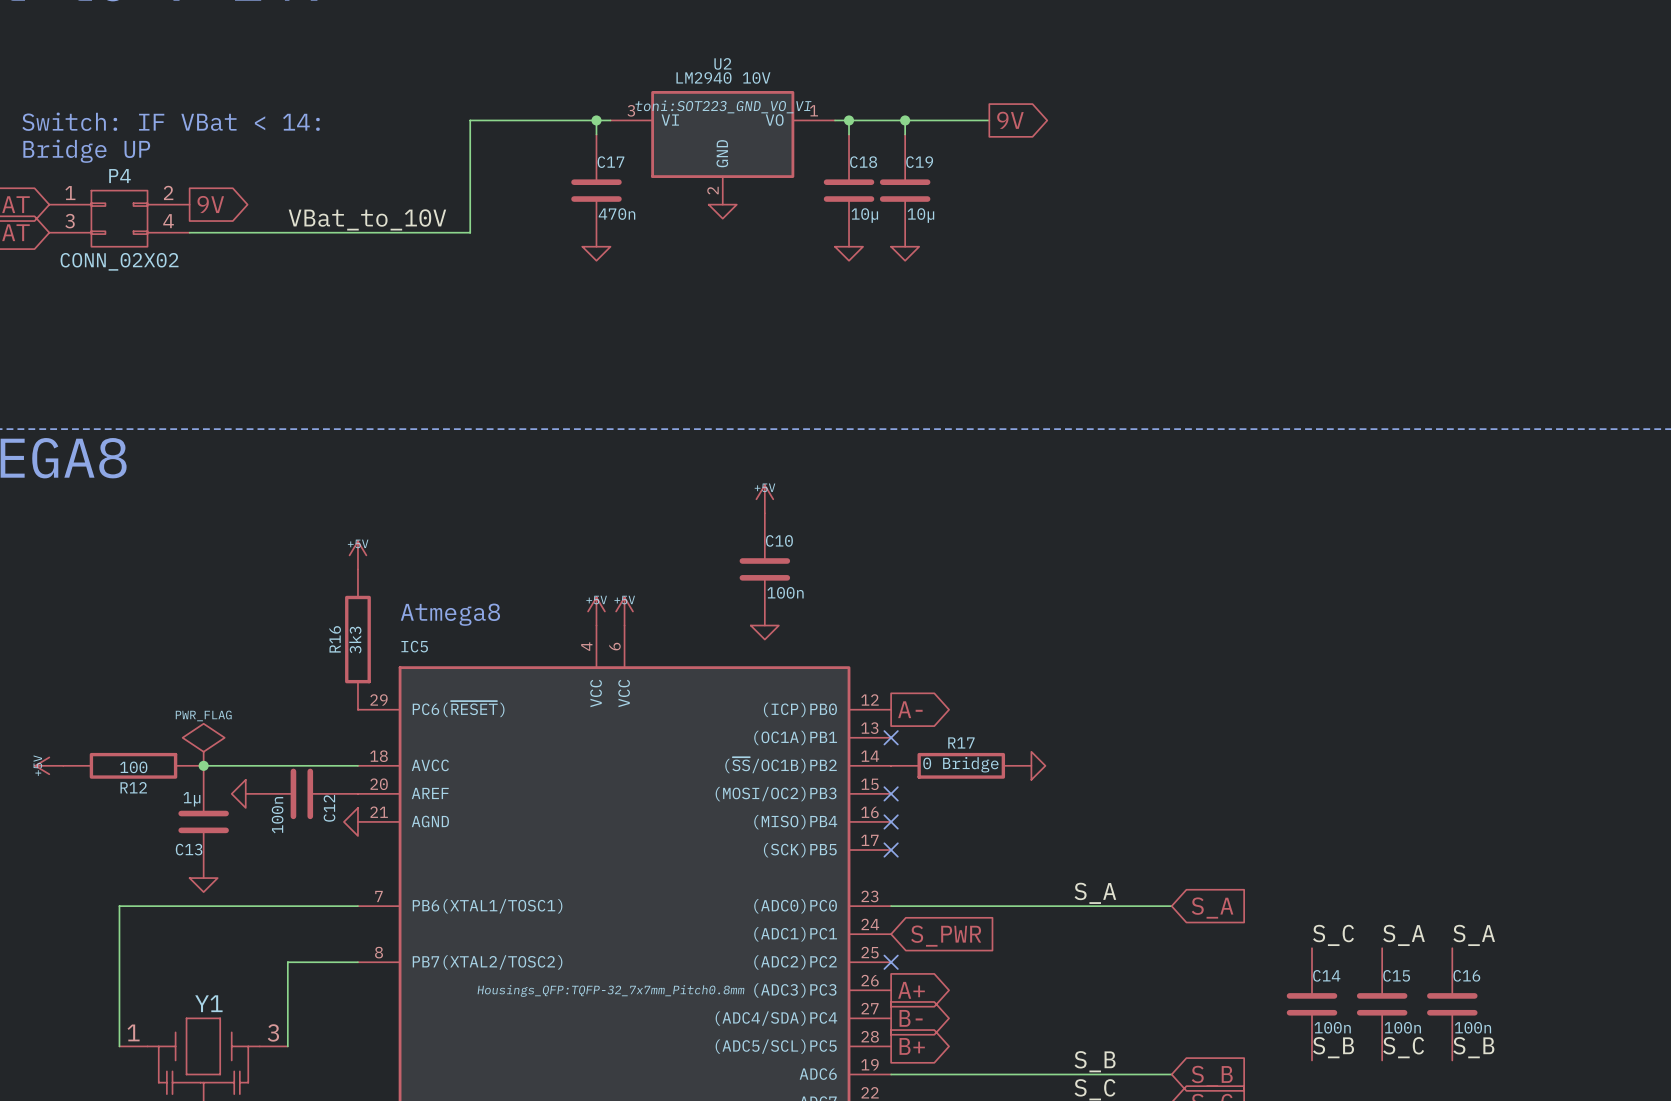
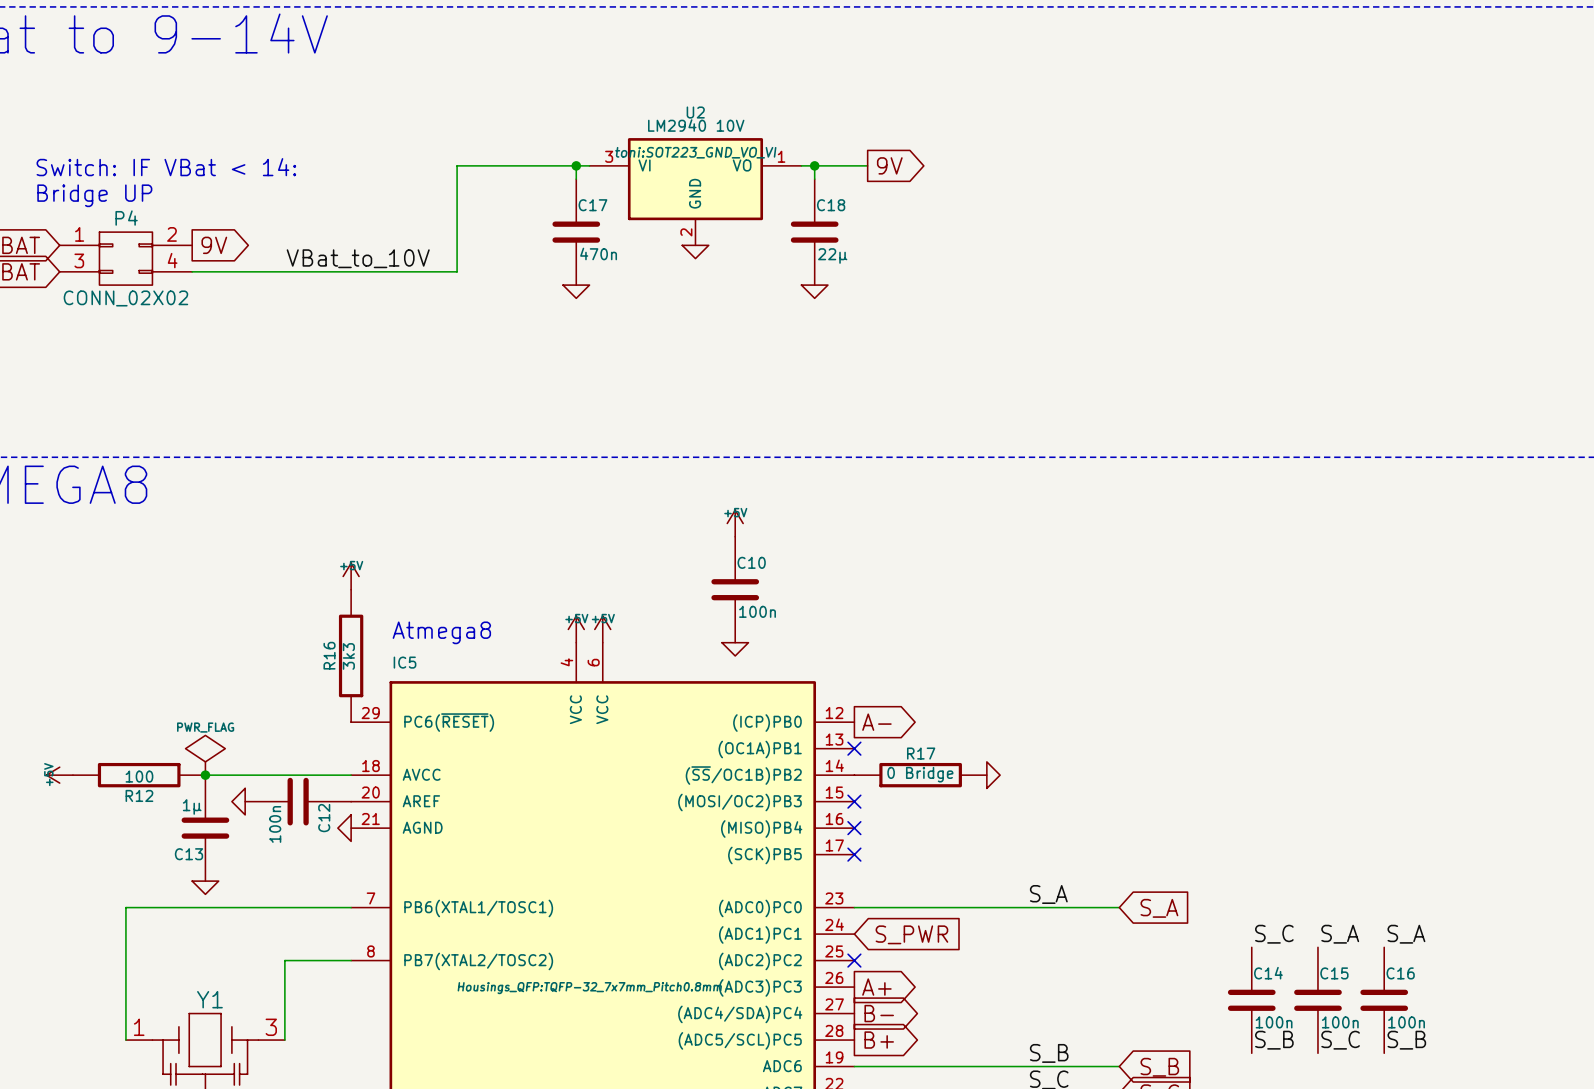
junction: (905, 120) -> none
wire: (989, 120) (905, 120) (905, 134) -> none
global label position: 9V (1010, 120) -> 9V (889, 165)
C19: 10µ (905, 190) -> none
C18 value: 10µ (864, 215) -> 22µ (832, 256)
power symbol: (905, 253) -> none

